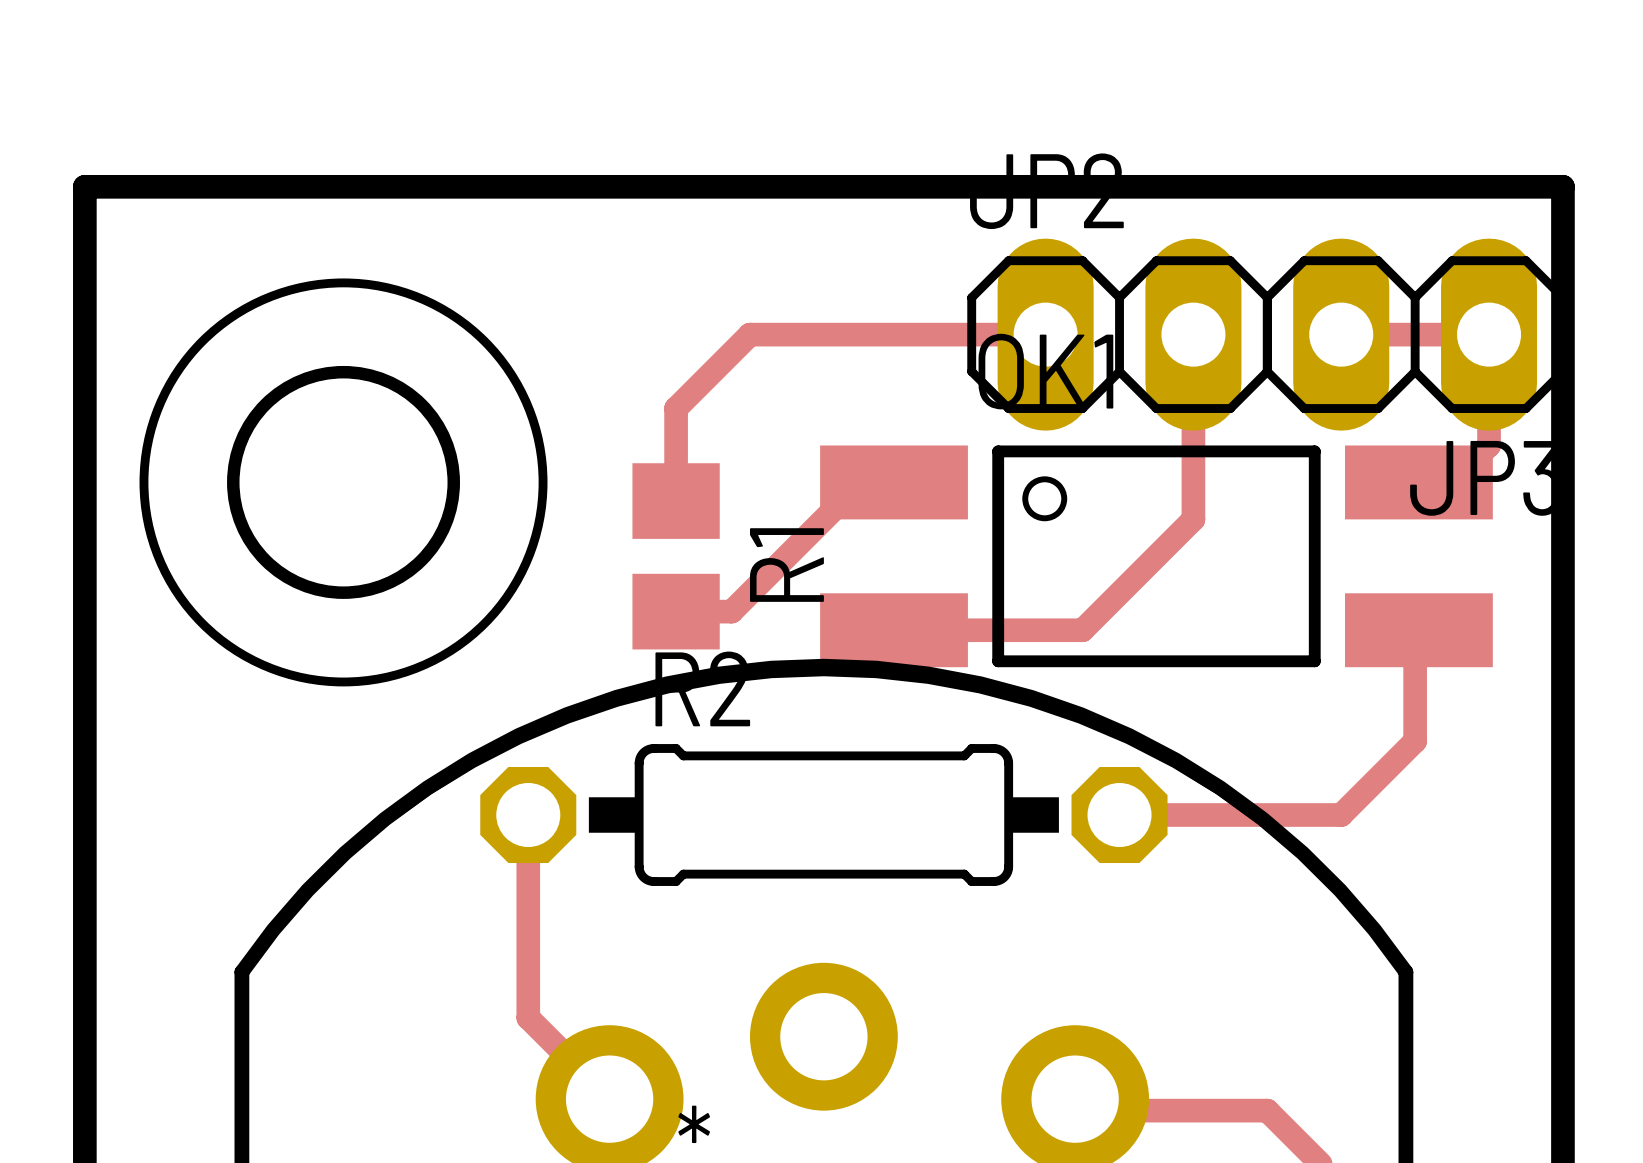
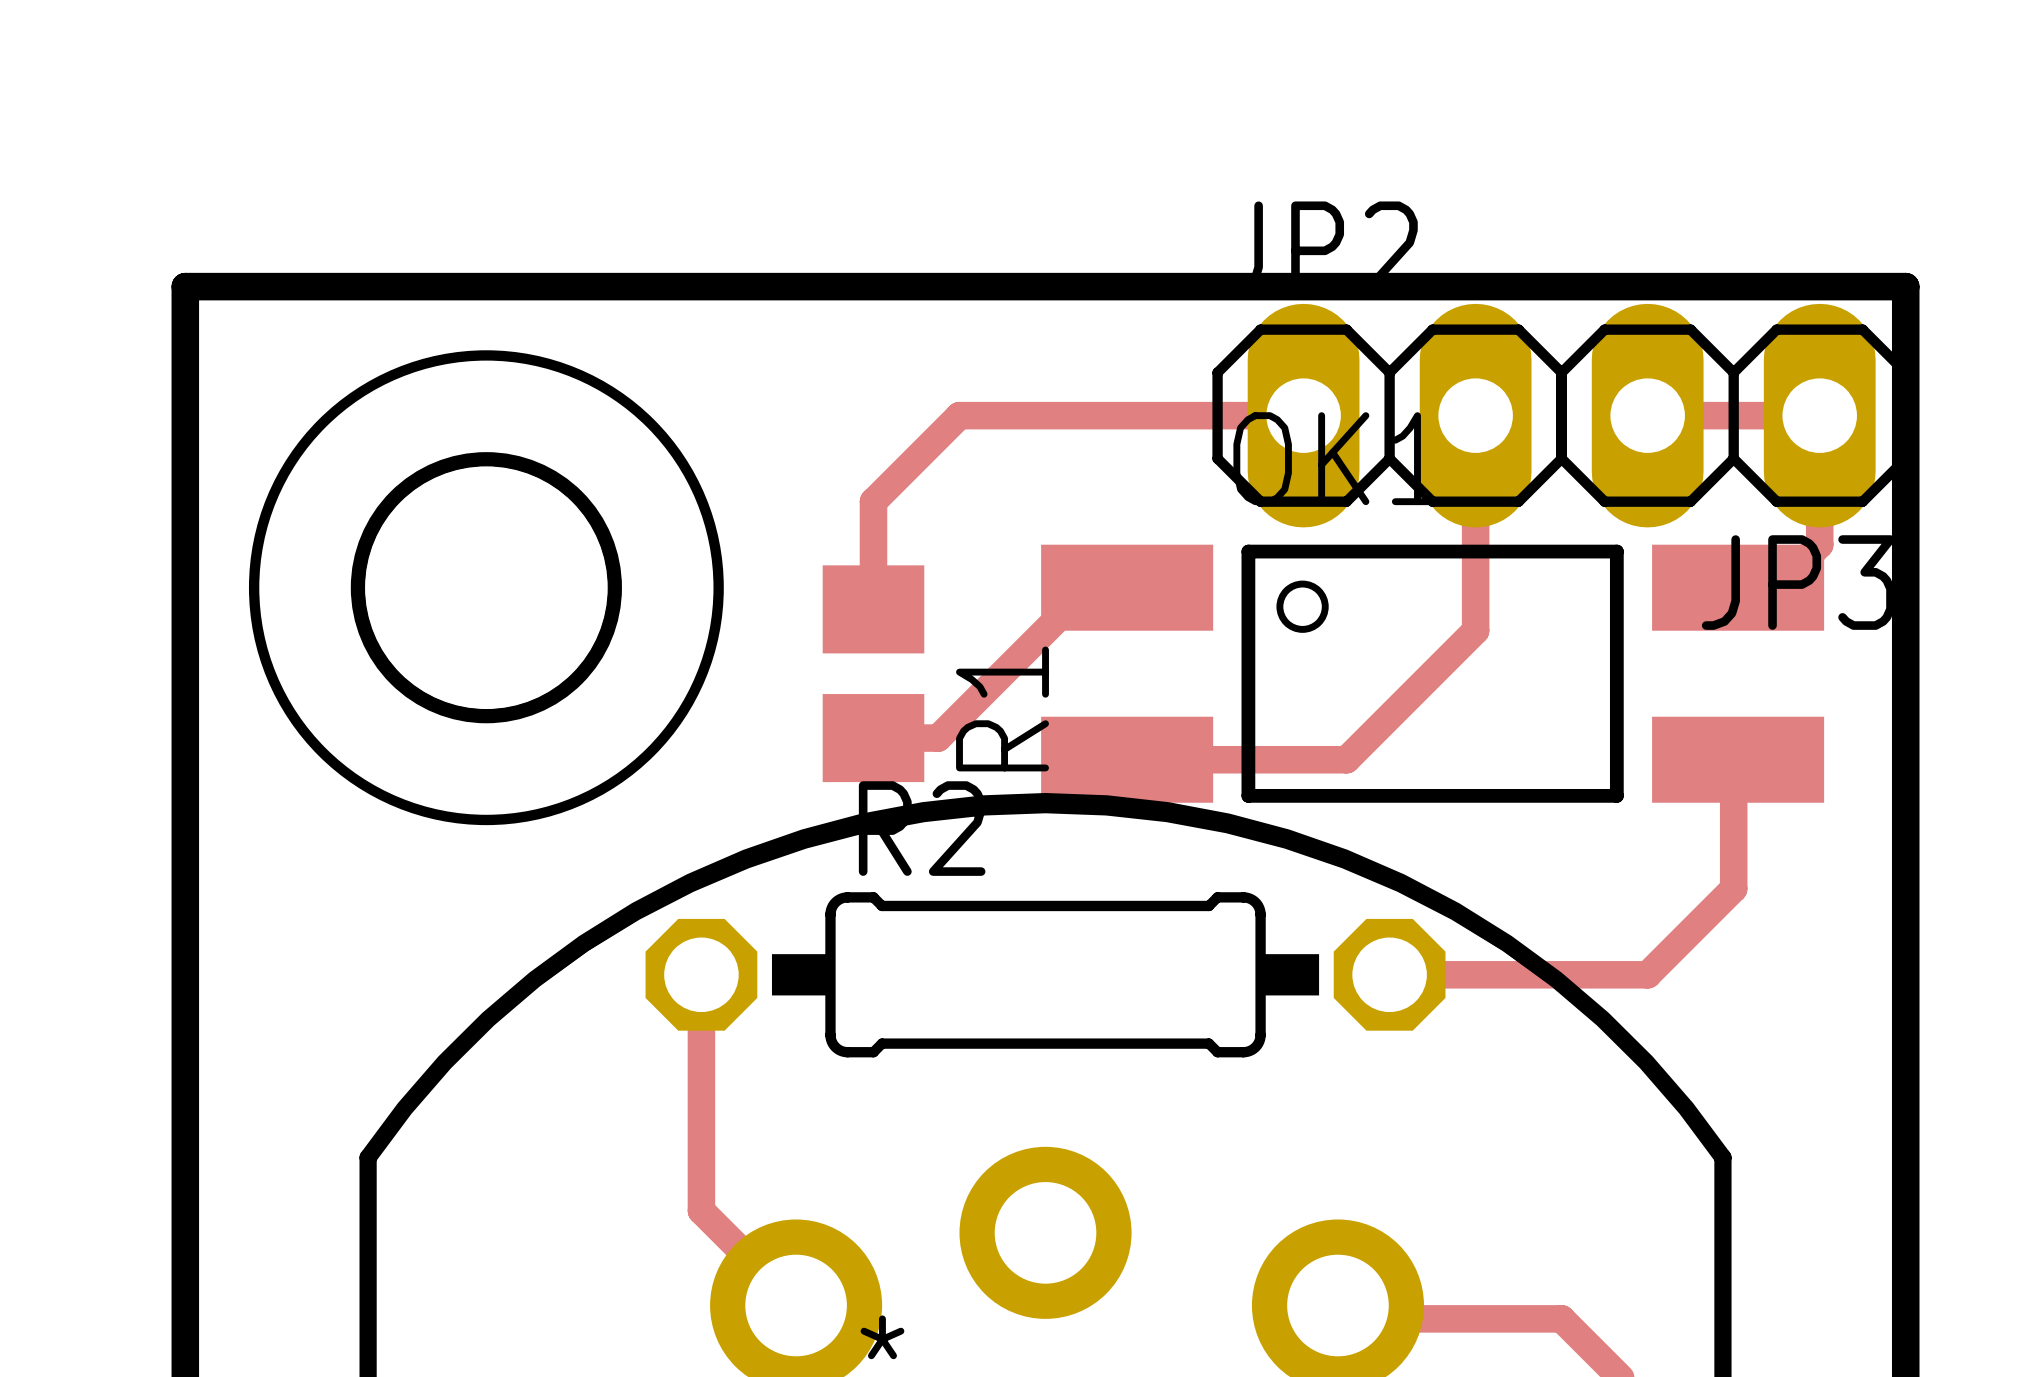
board edge: (84, 223) (84, 186) (1562, 186) (1562, 223) -> (185, 286) (1905, 286)

